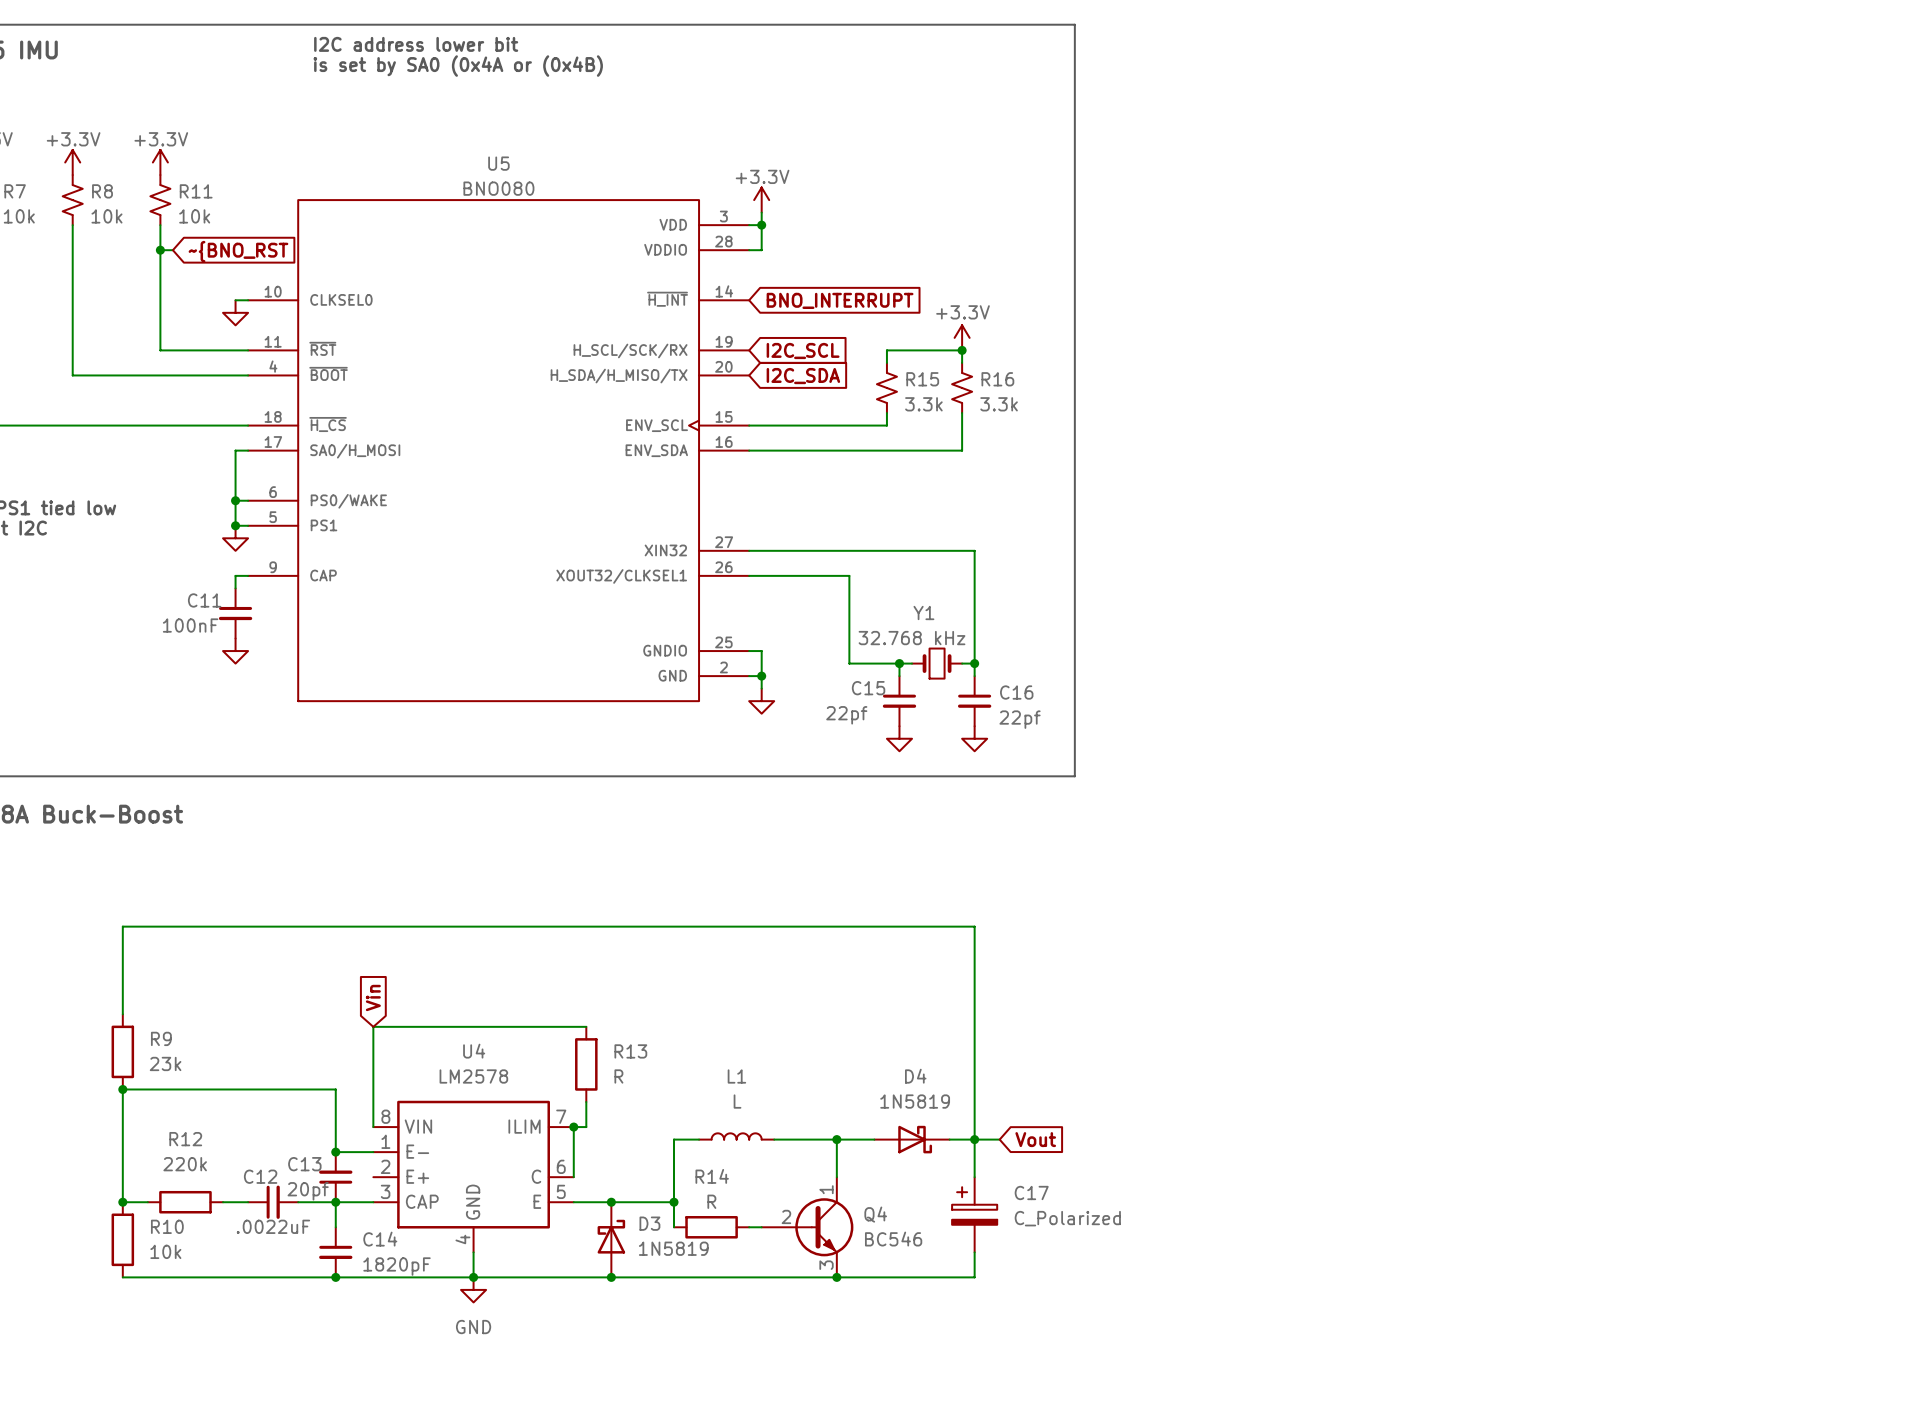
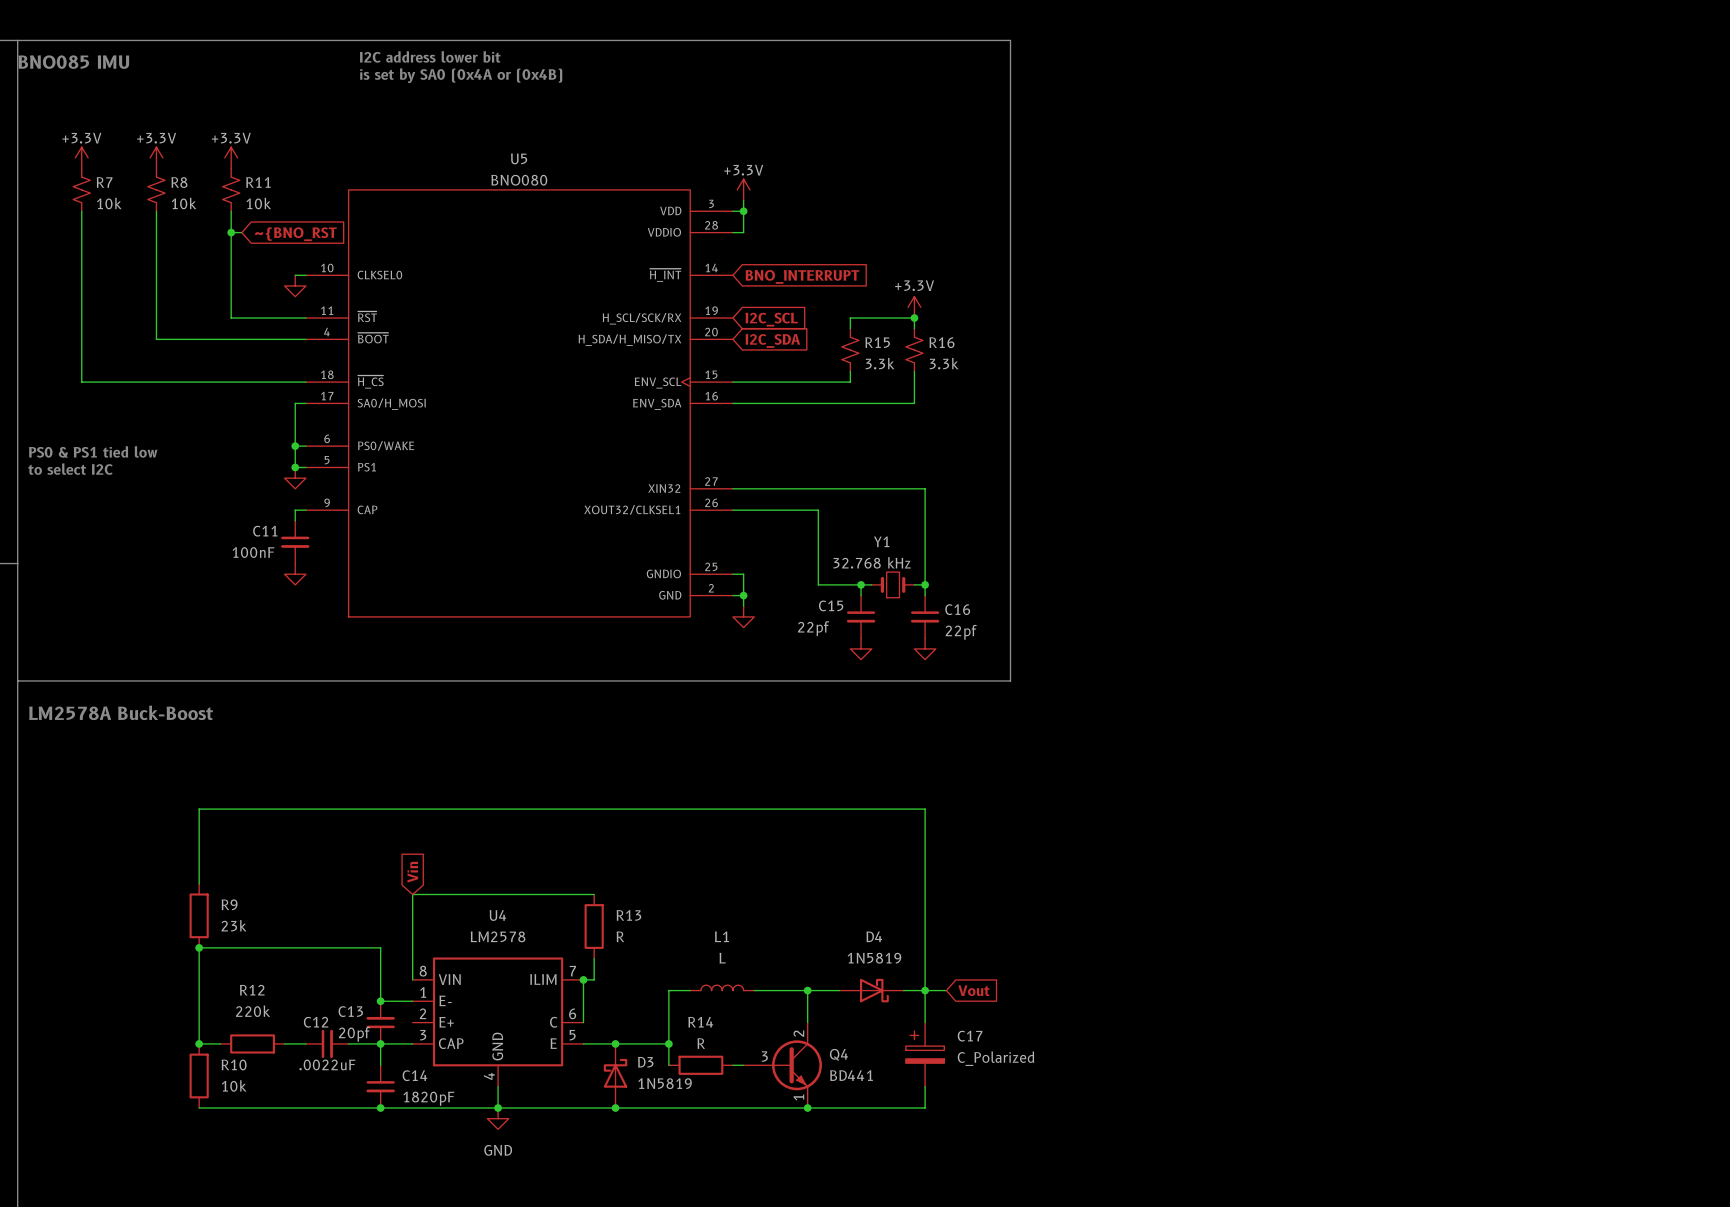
Q4 symbol: [761, 1177, 854, 1278] -> [743, 1022, 822, 1109]
Q4 value: BC546 (893, 1239) -> BD441 (851, 1075)

